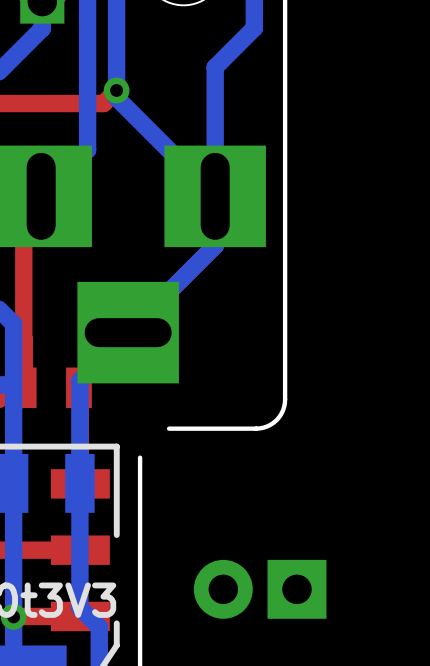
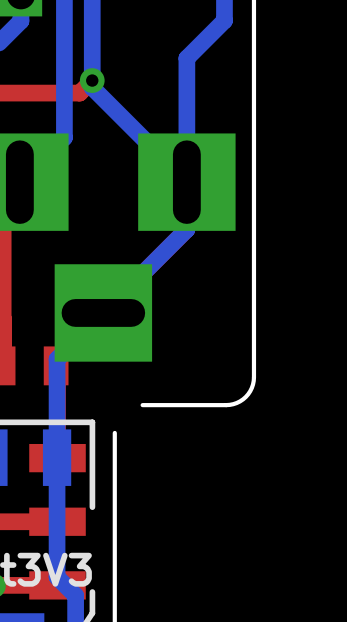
part: (260, 589) -> none

